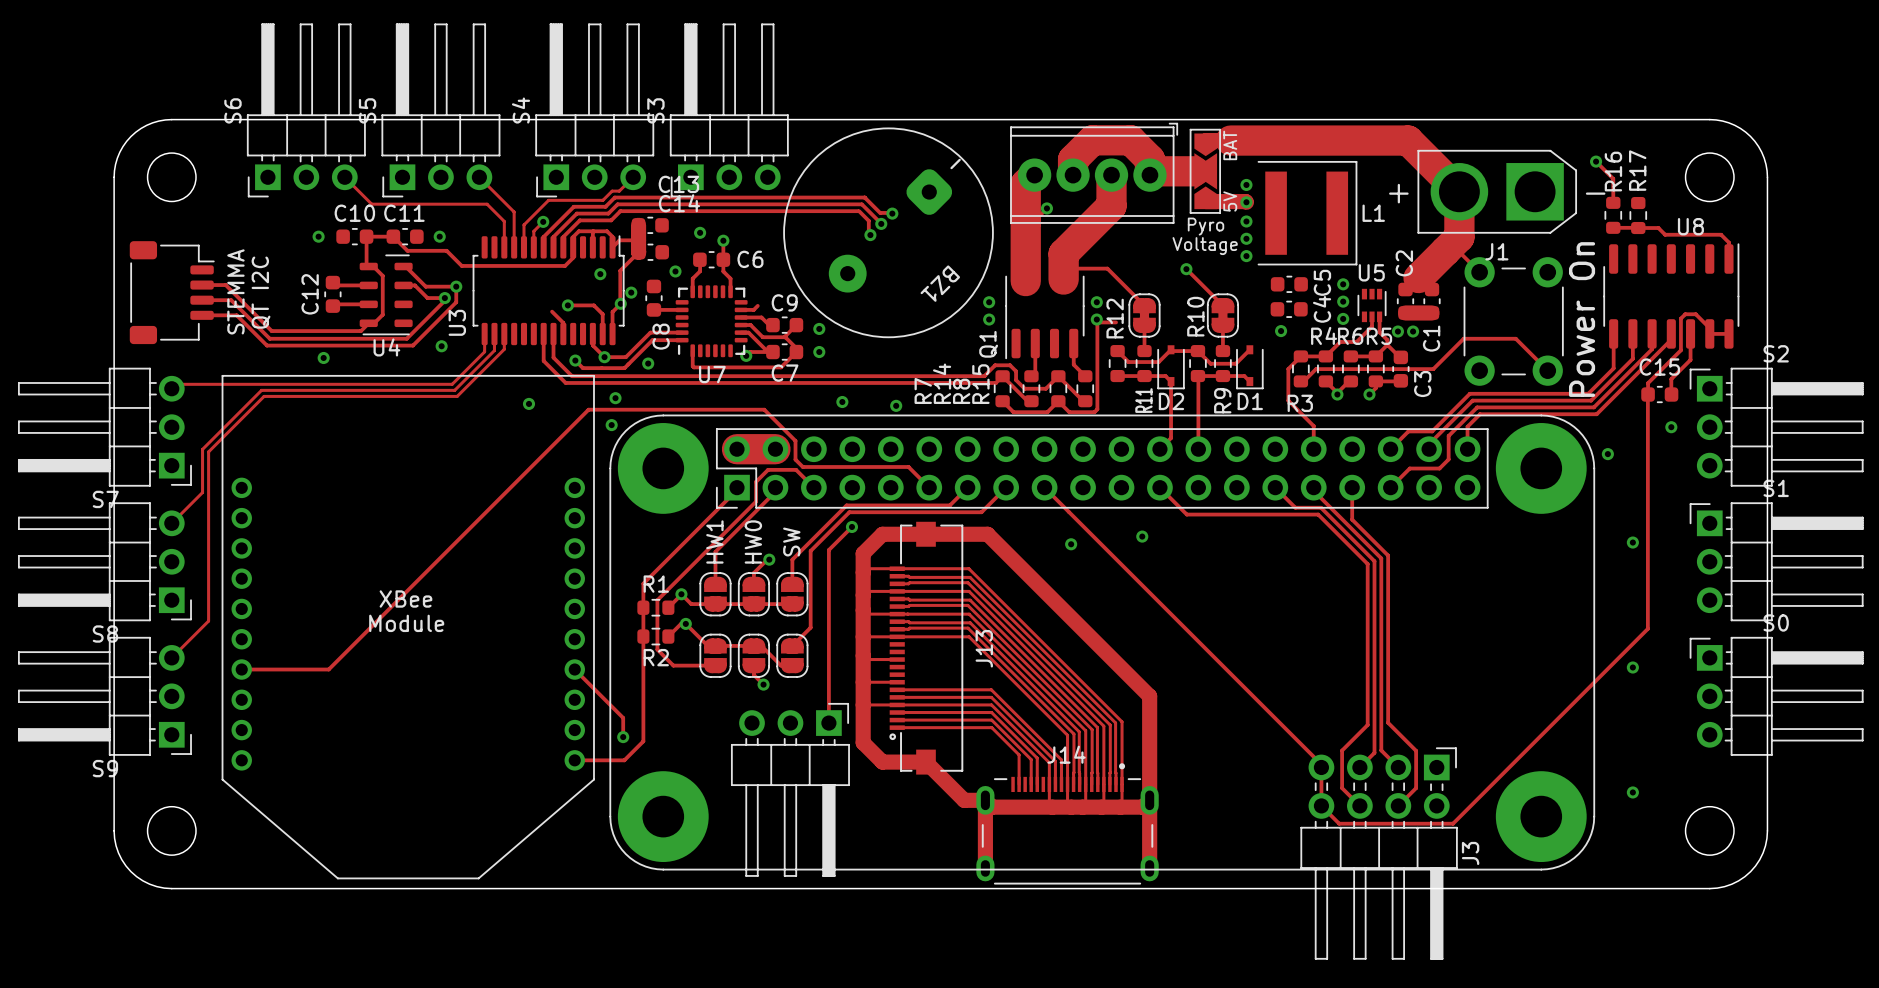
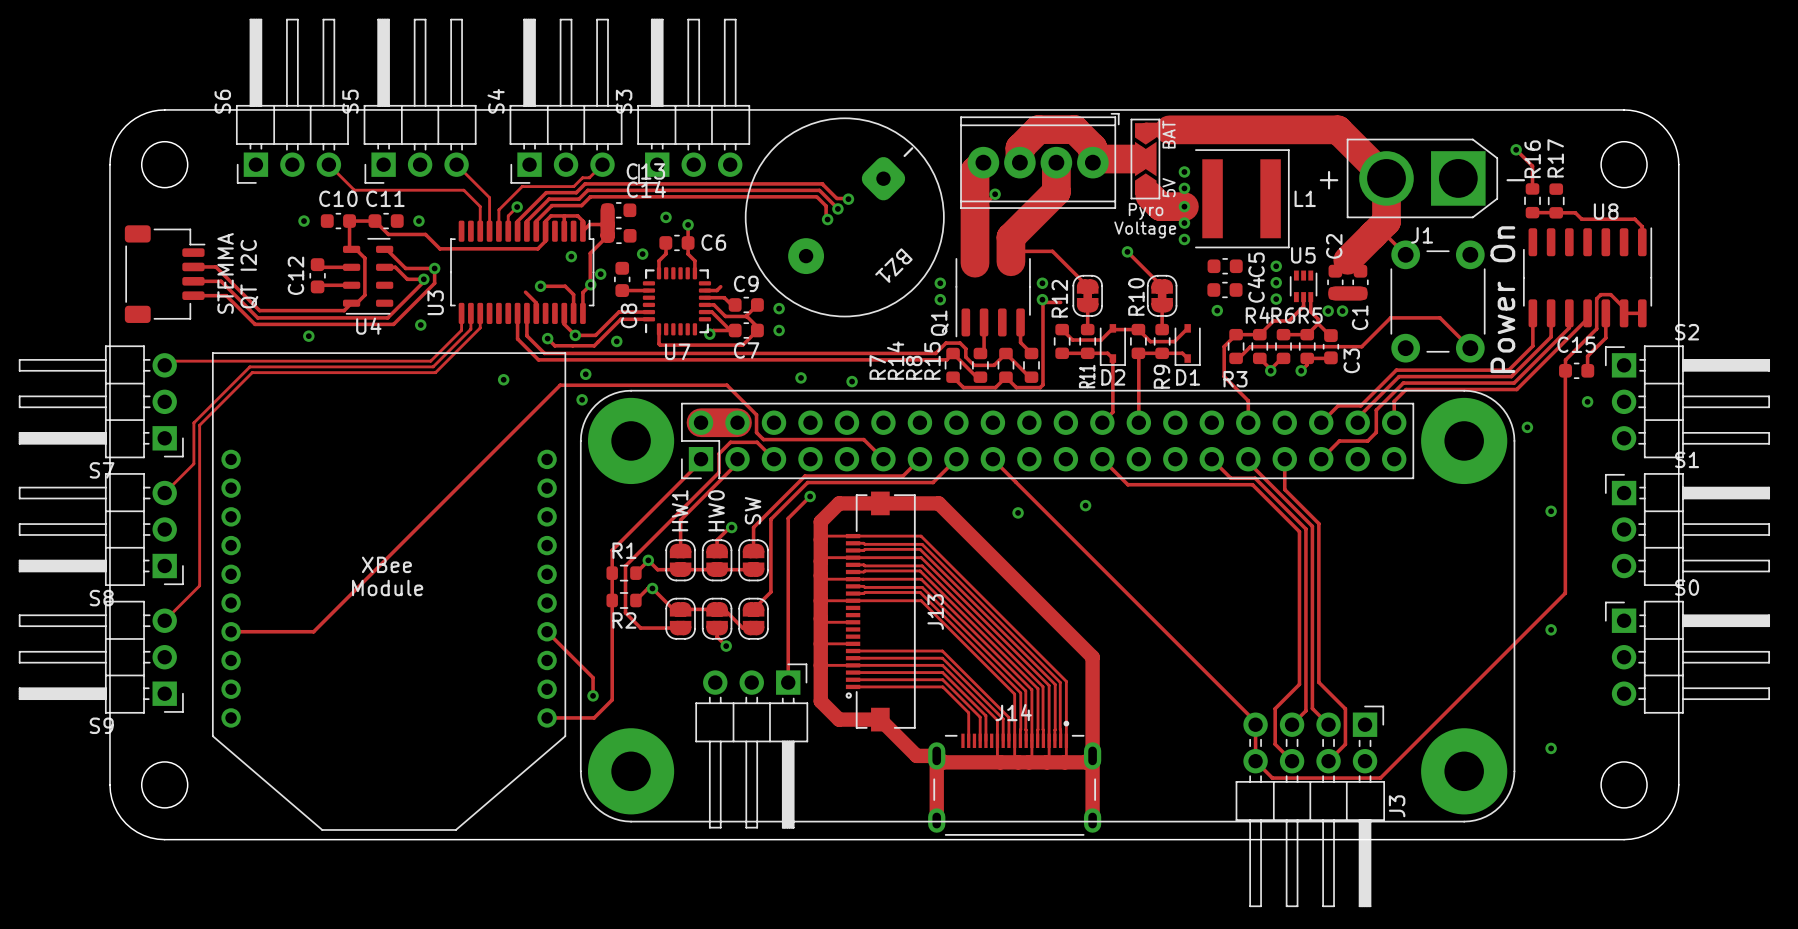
track: (1205, 201) (1246, 202) -> none
track: none -> (1149, 195) (1160, 206) (1184, 206)

